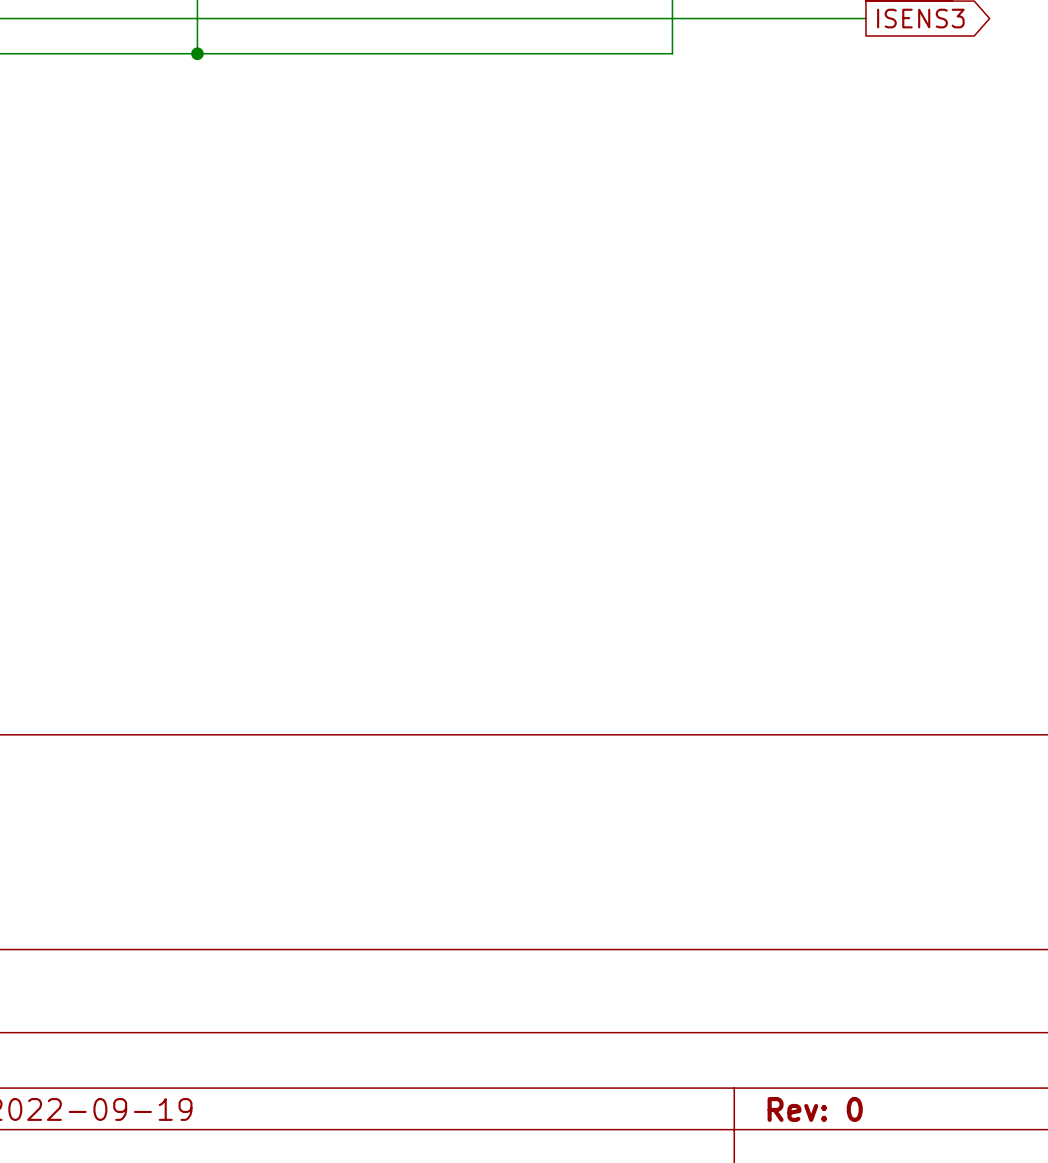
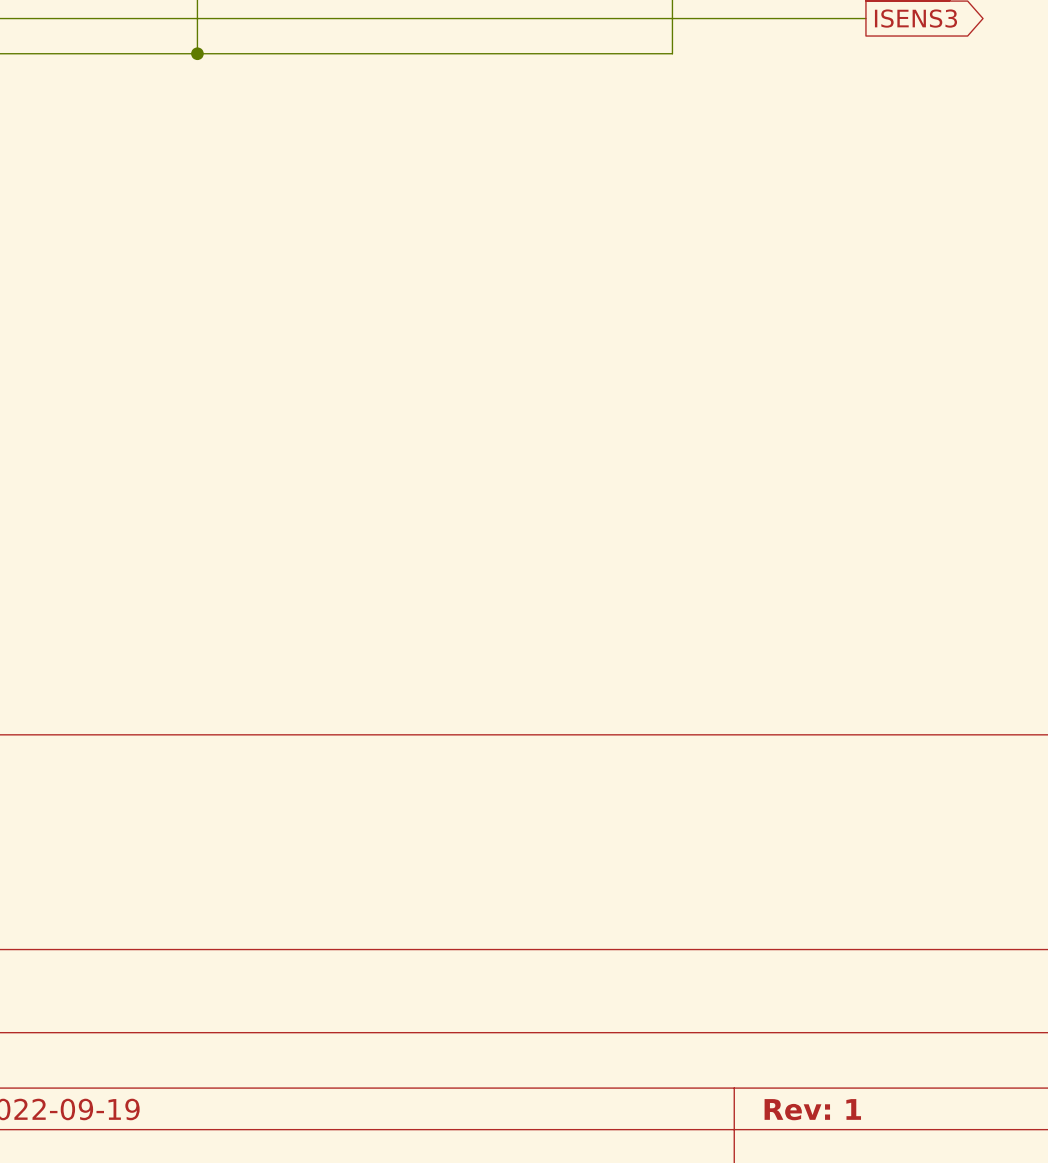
title block: Rev: 0 (815, 1109) -> Rev: 1 (812, 1109)

